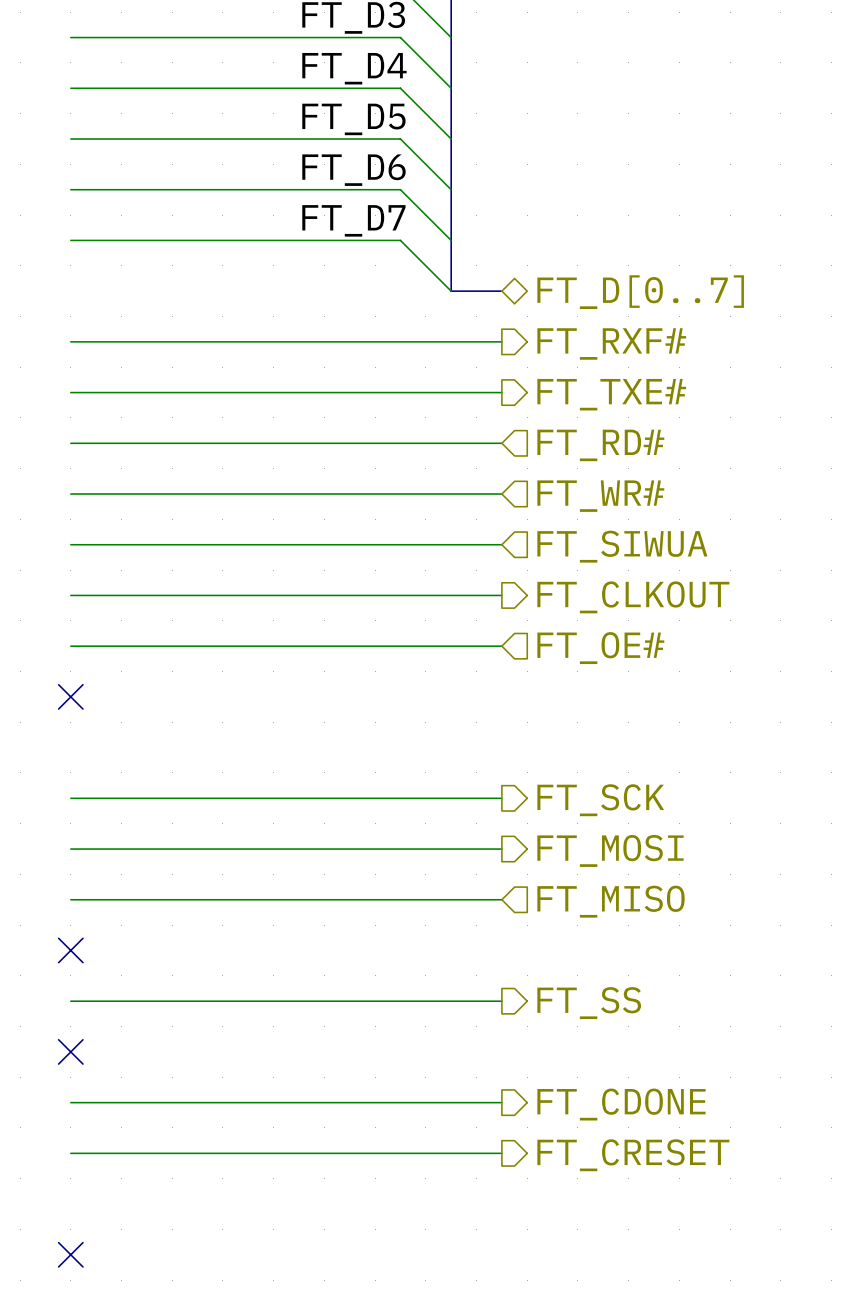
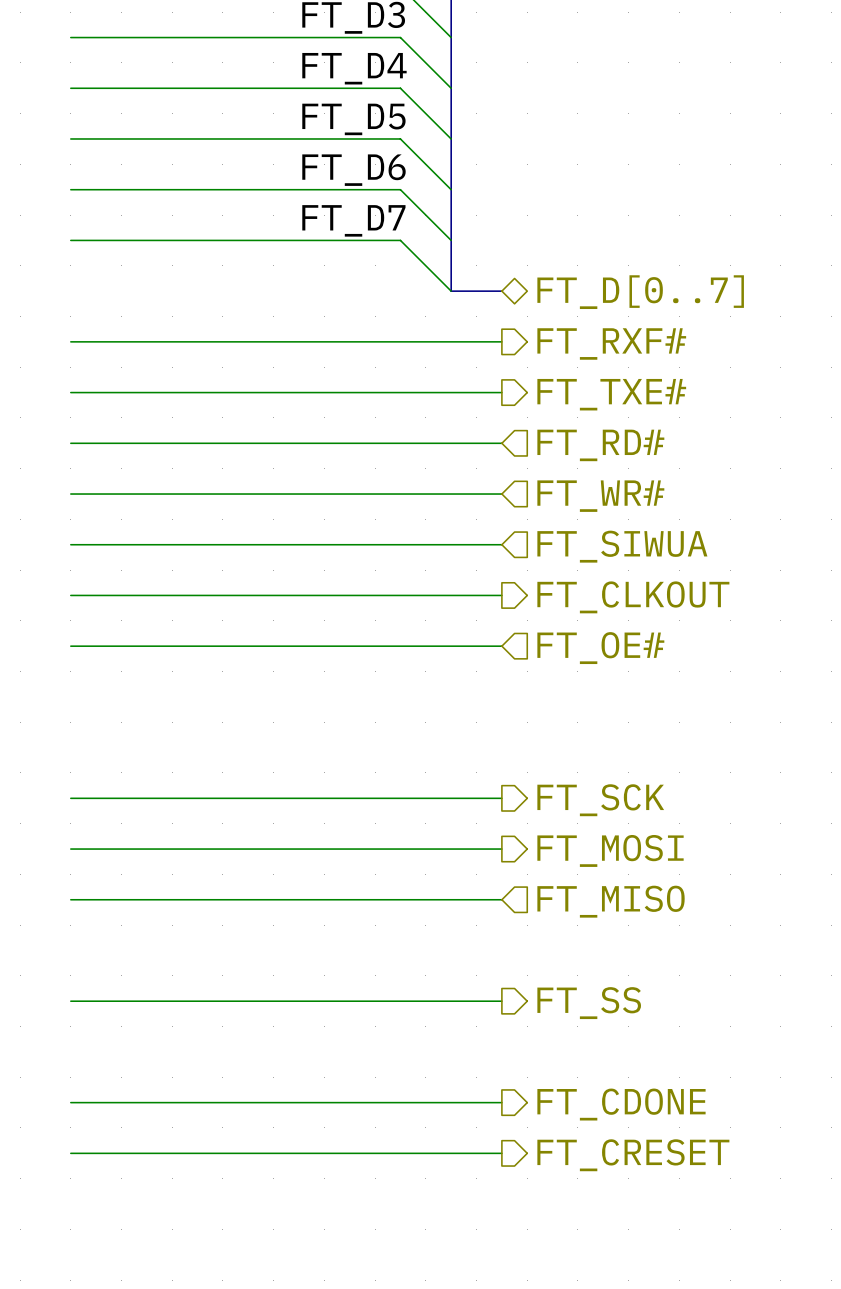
no-connect mark: (70, 696) -> none
no-connect mark: (70, 950) -> none
no-connect mark: (70, 1051) -> none
no-connect mark: (70, 1254) -> none

